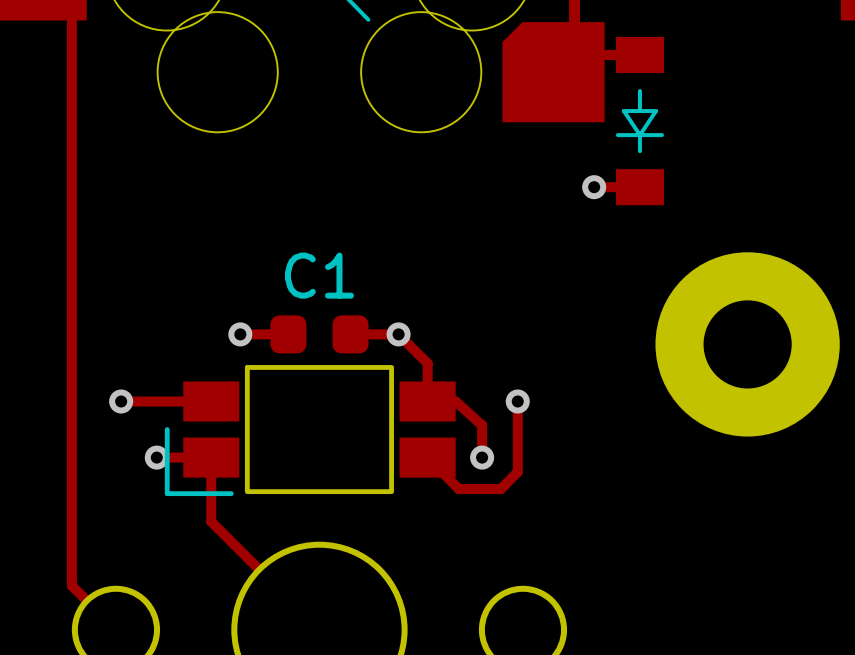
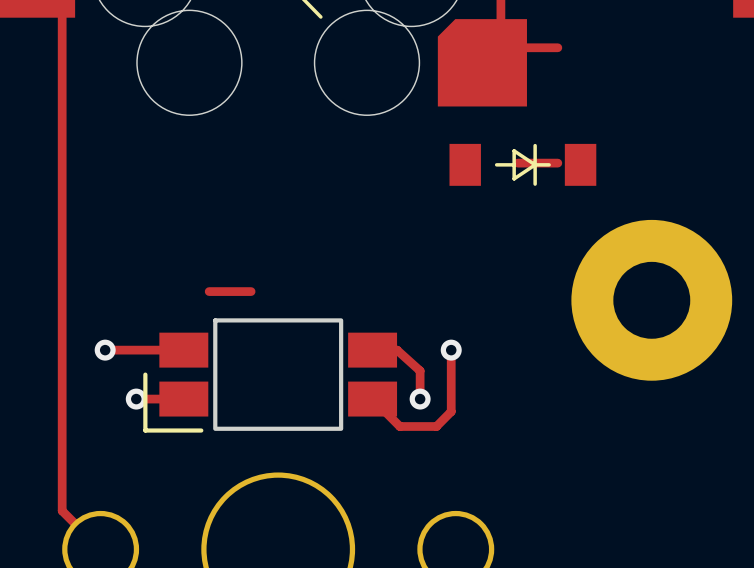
part rotation: 0° (639, 121) -> 90° counterclockwise (522, 164)
via: (594, 187) -> none
via: (240, 334) -> none
C1: (319, 334) -> none
track: (350, 334) (398, 334) (427, 363) (427, 401) -> none
via: (398, 334) -> none
track: (211, 457) (211, 521) (319, 629) -> none

